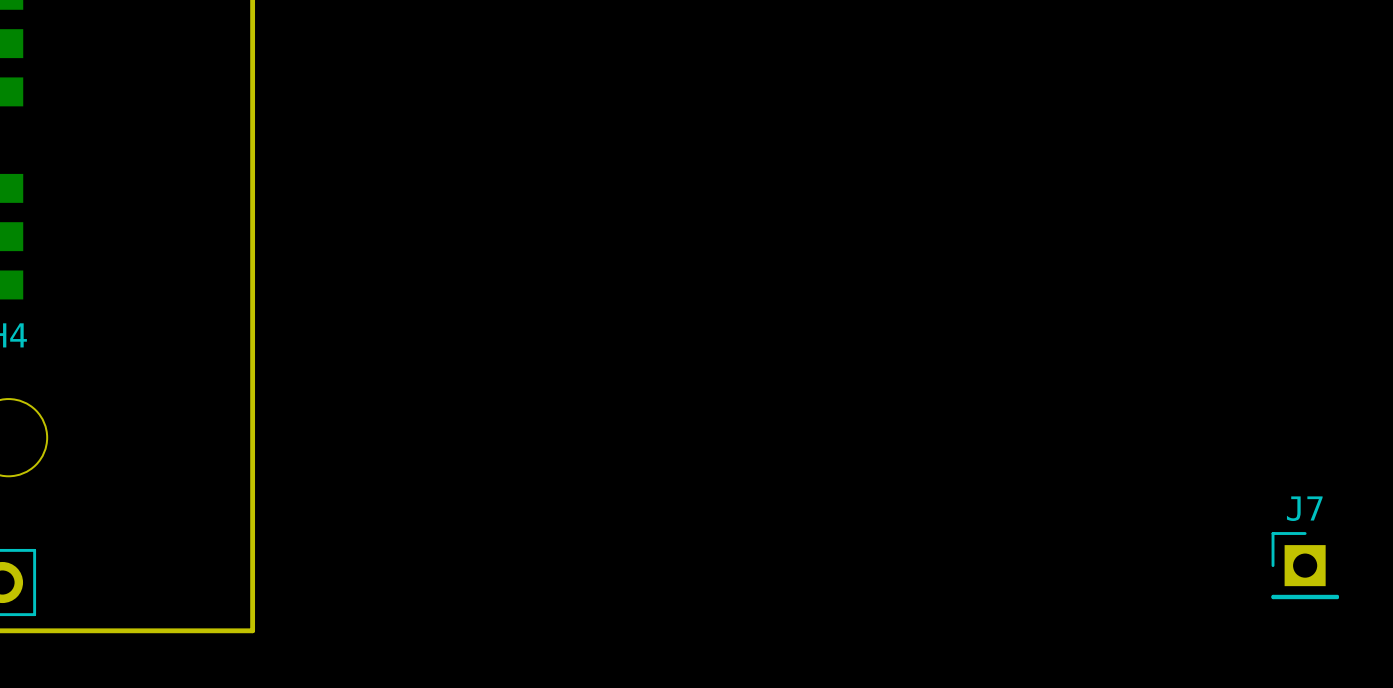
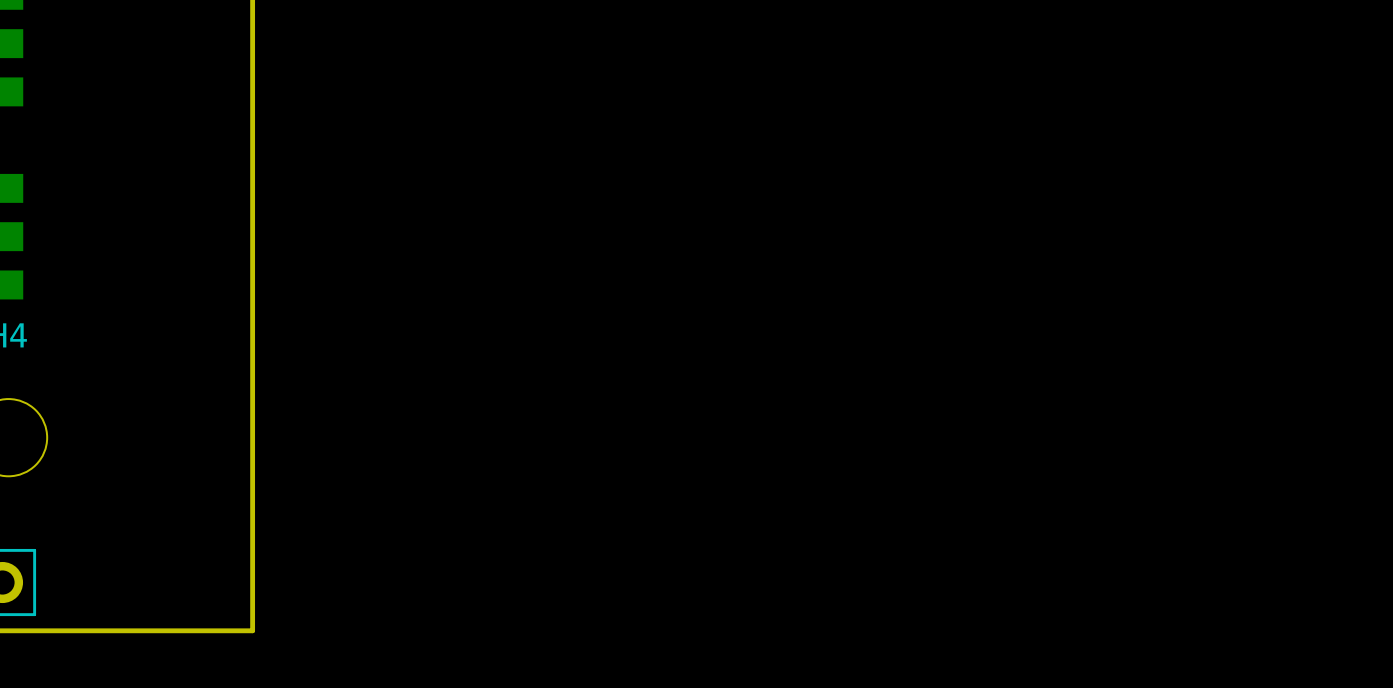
J7: (1305, 565) -> none

